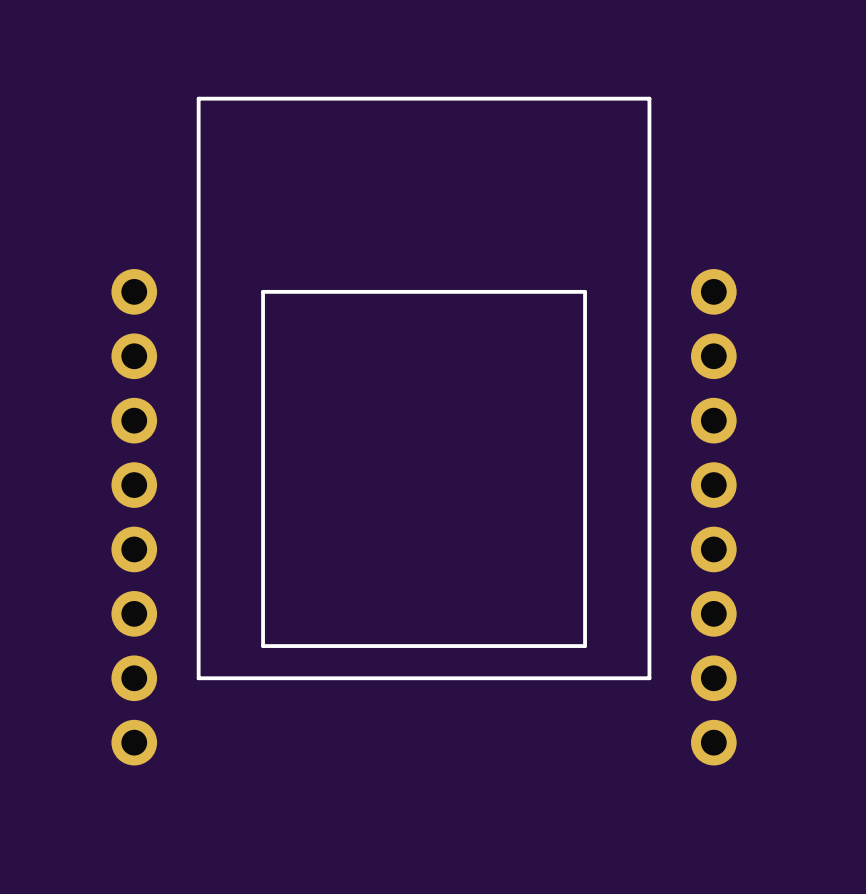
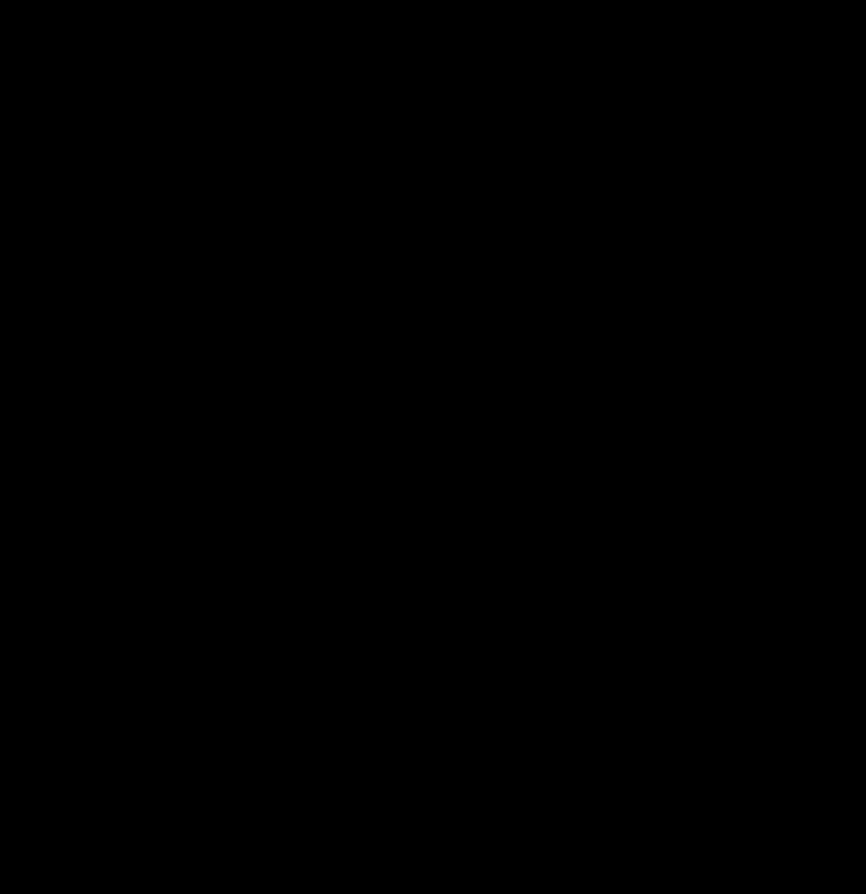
part: (424, 431) -> none

